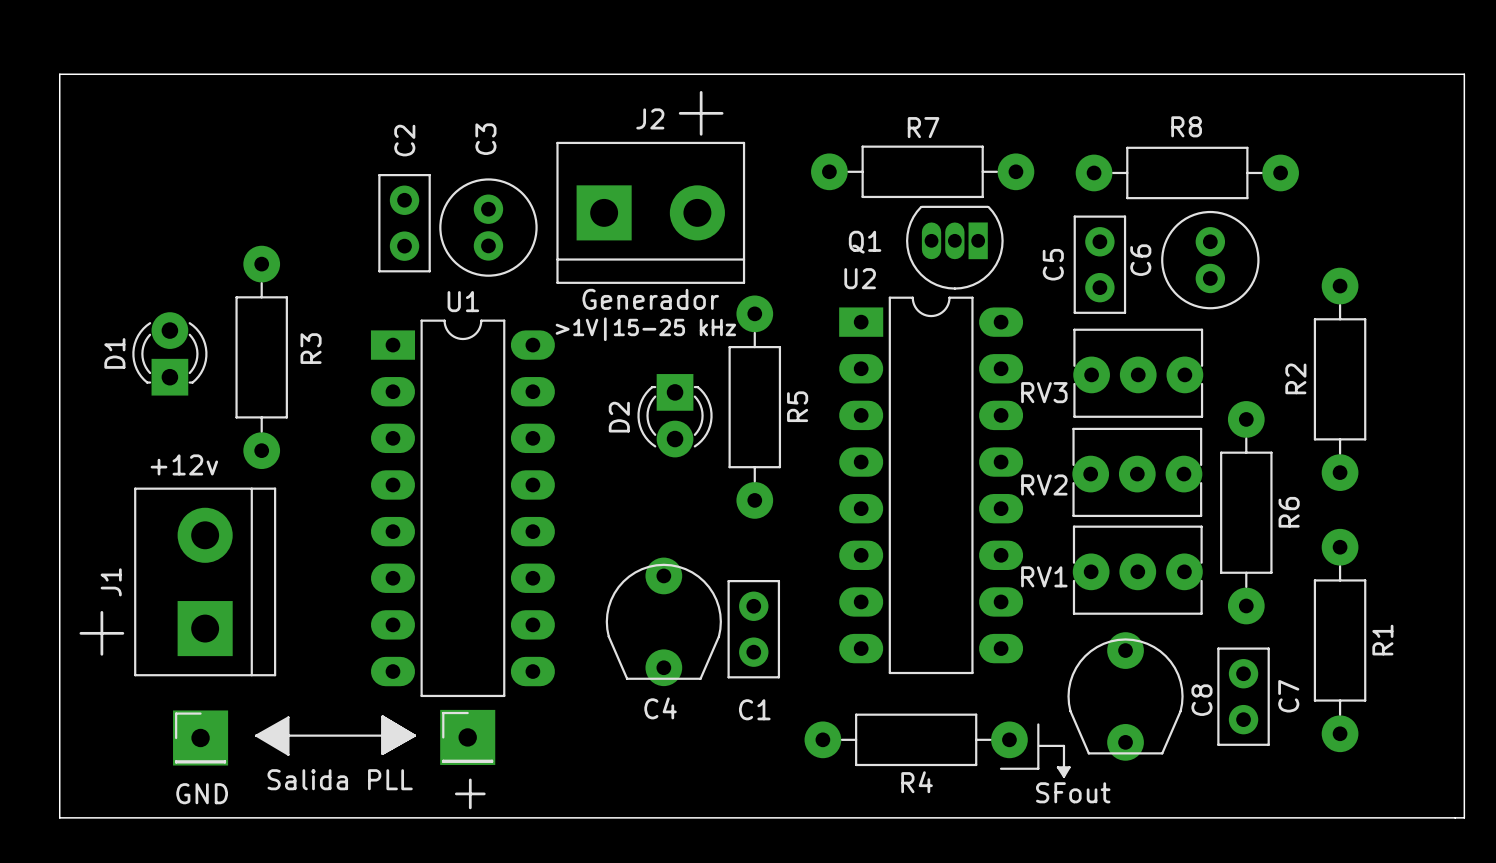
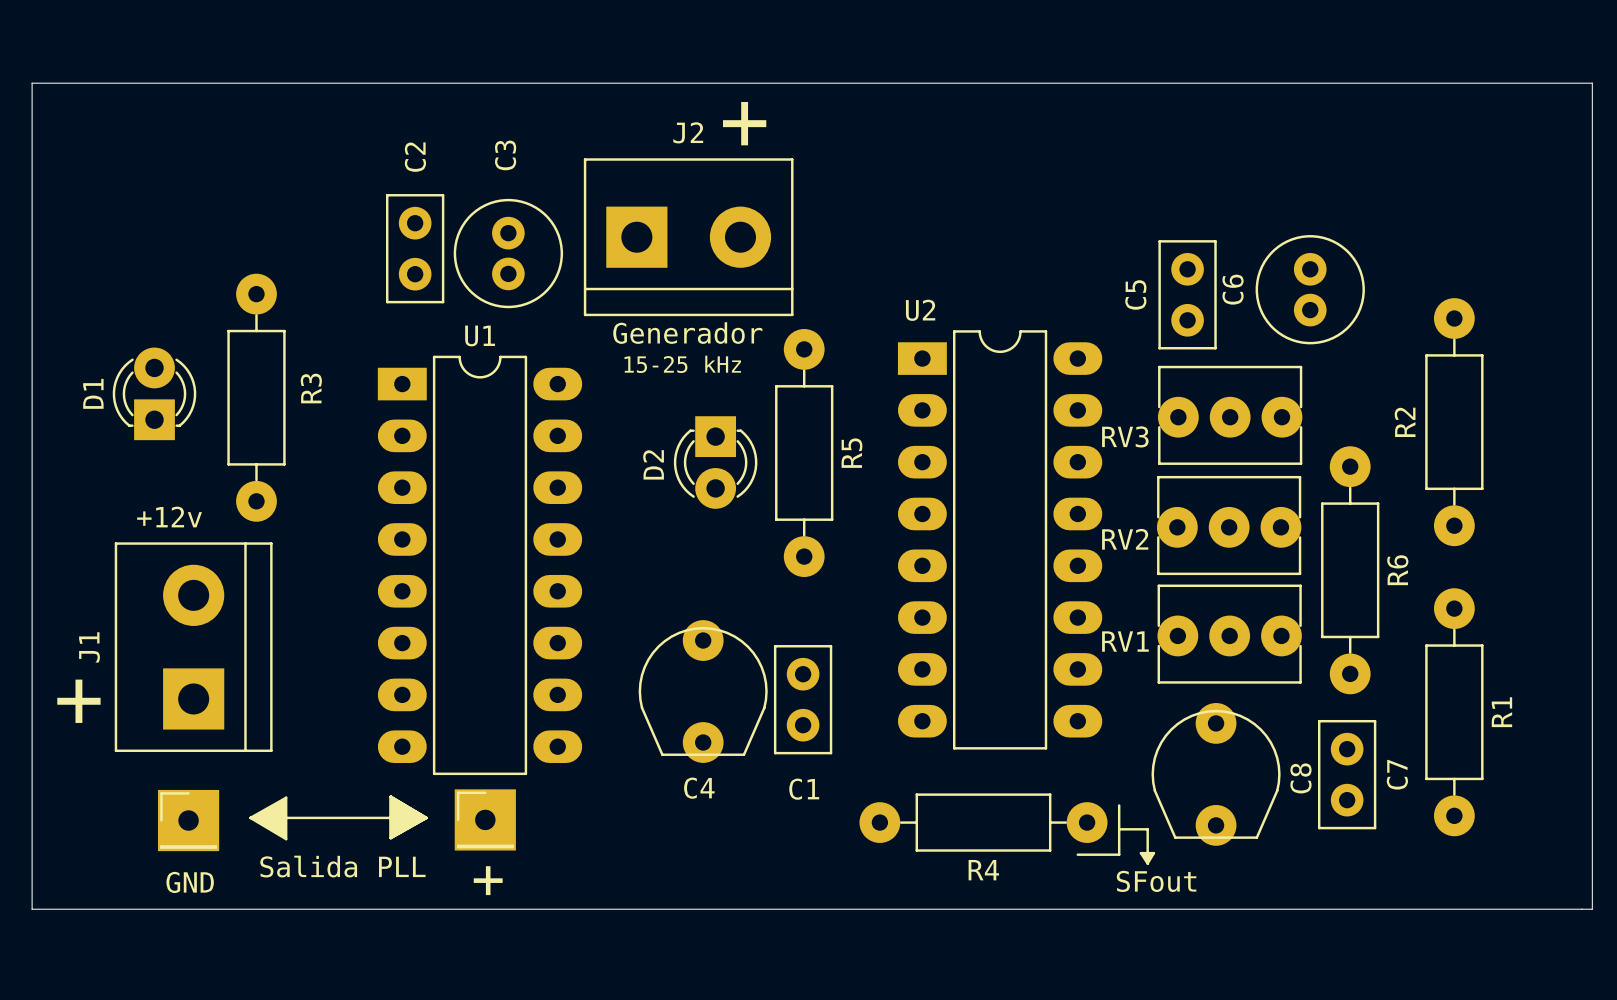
R7: (922, 171) -> none
R8: (1187, 172) -> none
Q1: (954, 247) -> none
text: >1V|15-25 kHz (645, 329) -> 15-25 kHz (682, 364)

